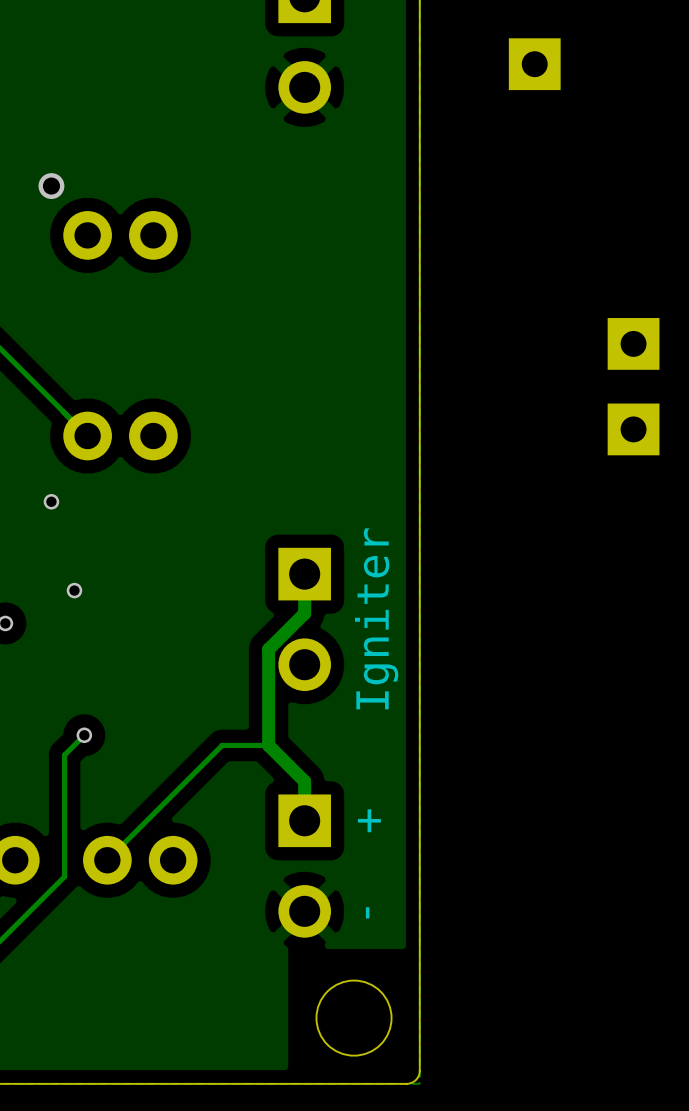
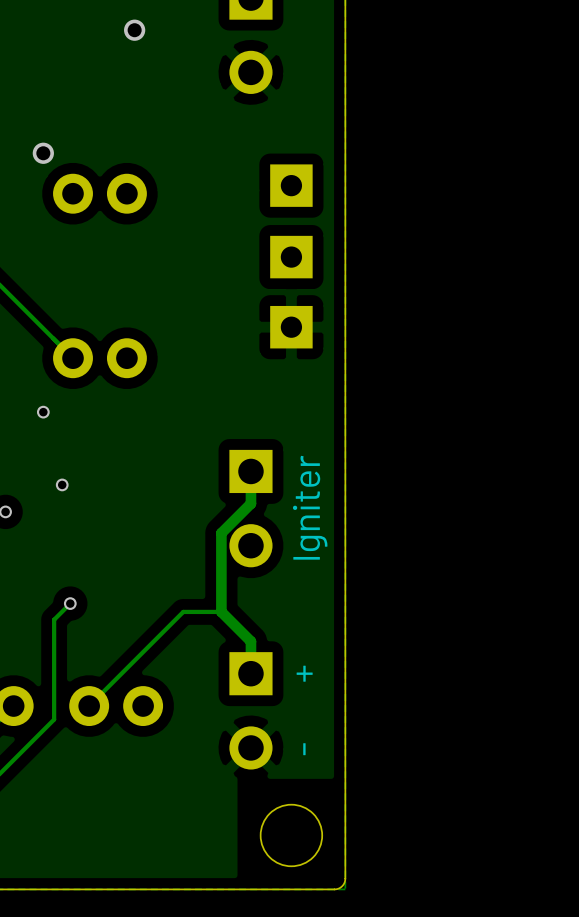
via: none -> (134, 30)
part: (534, 64) -> none
part: none -> (291, 185)
part: none -> (291, 257)
part: (633, 343) -> none
part: none -> (291, 327)
part: (633, 429) -> none

